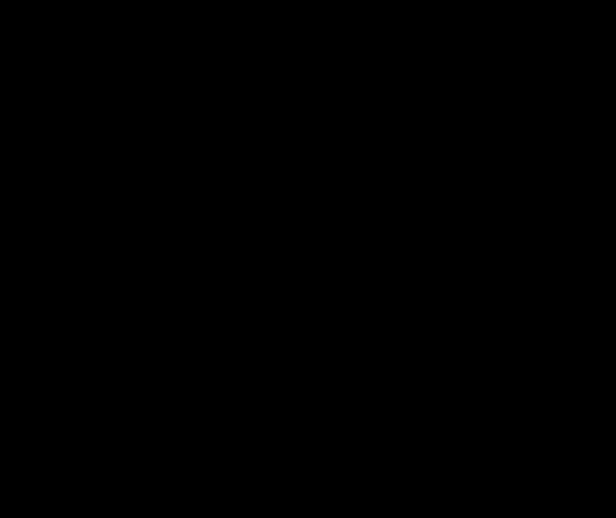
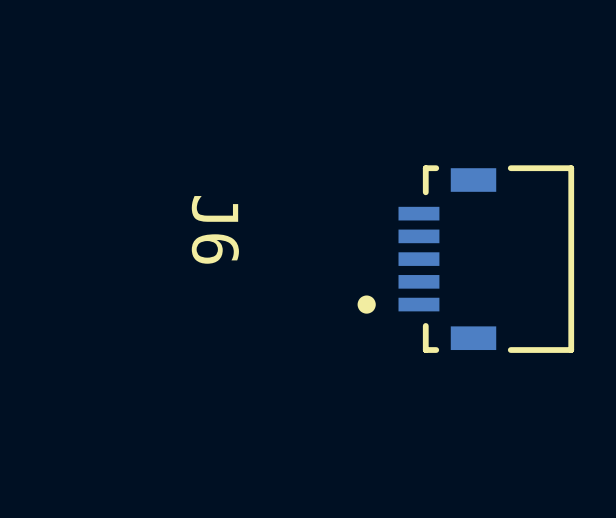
J6: none -> (465, 259)

